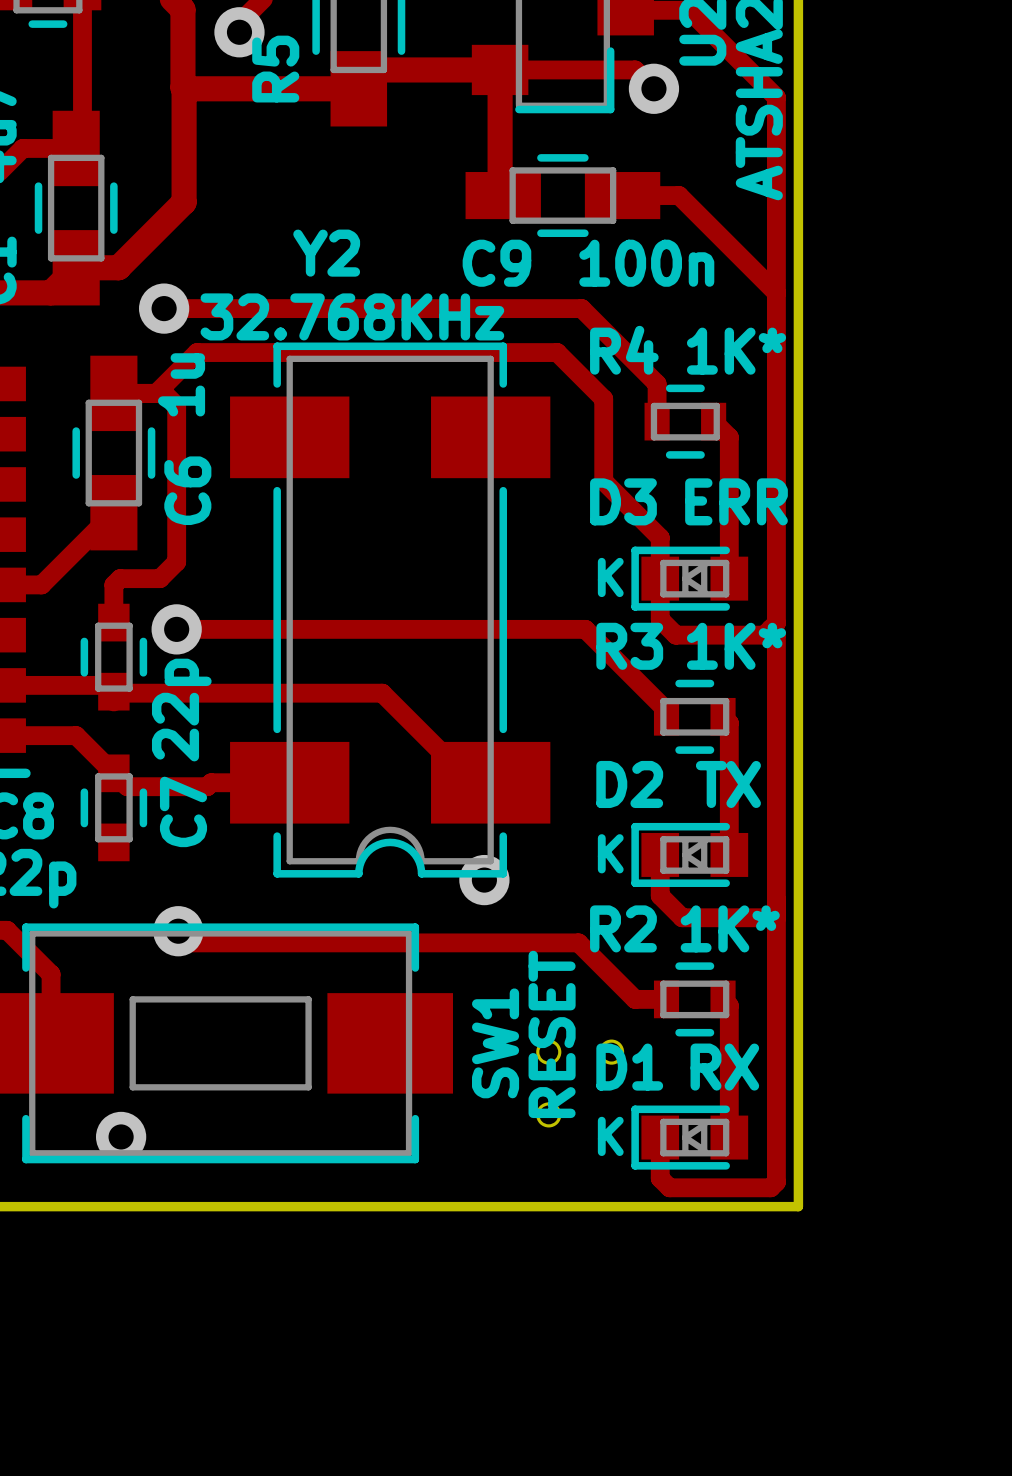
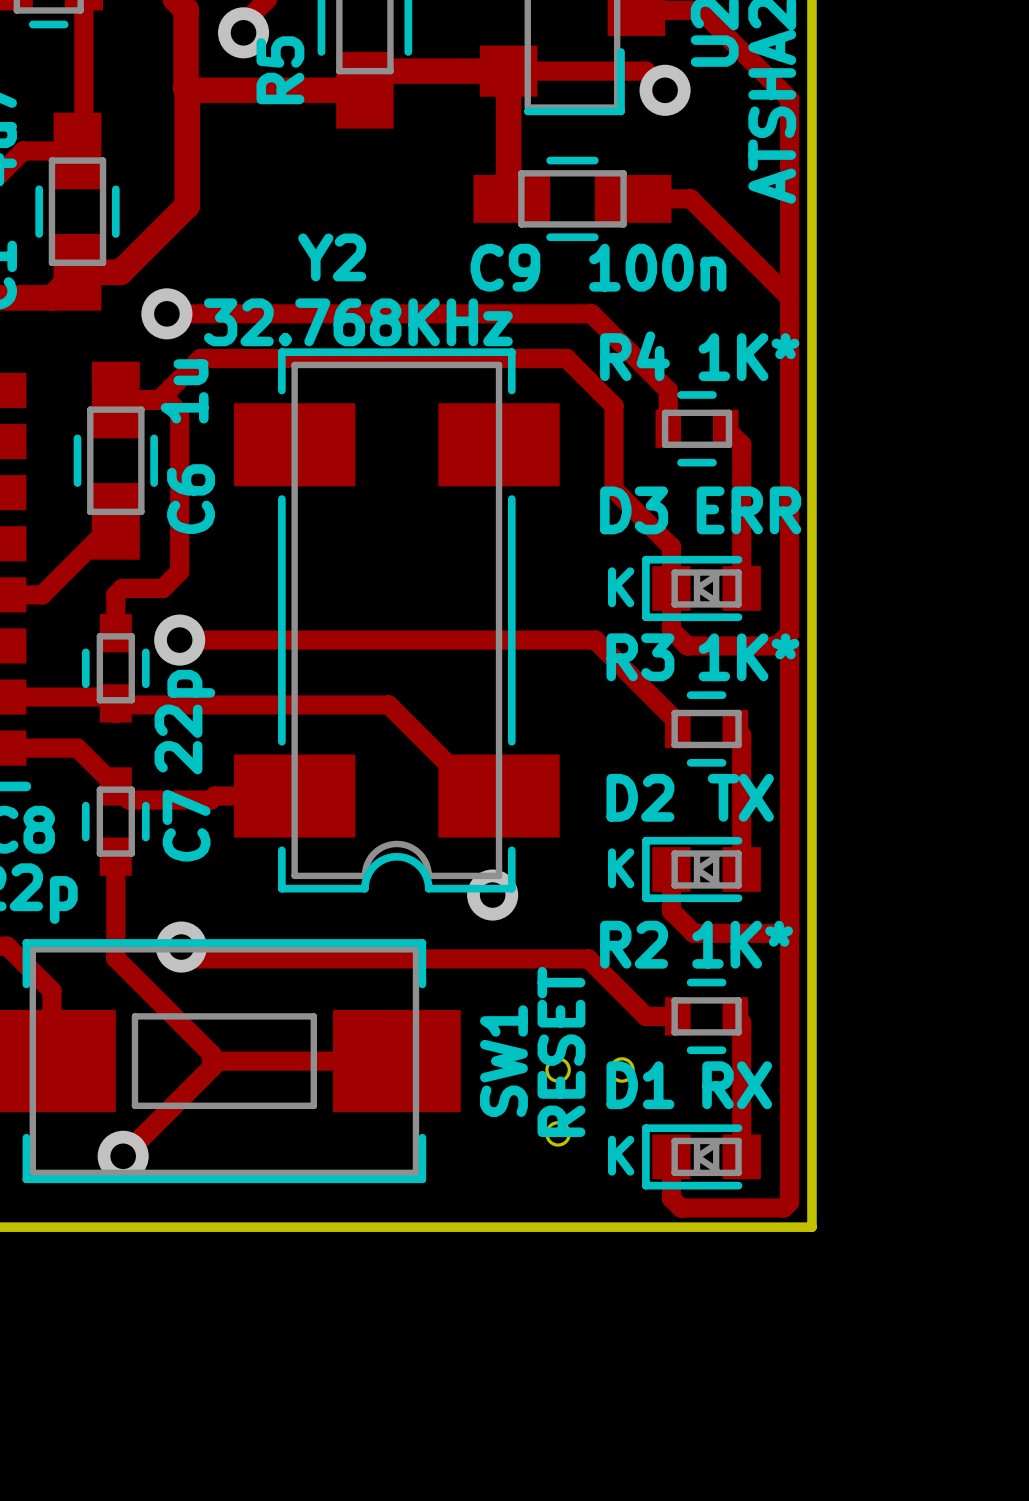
track: none -> (115, 856) (115, 958) (211, 1054) (211, 1067)
track: none -> (396, 1061) (218, 1061) (123, 1156)

